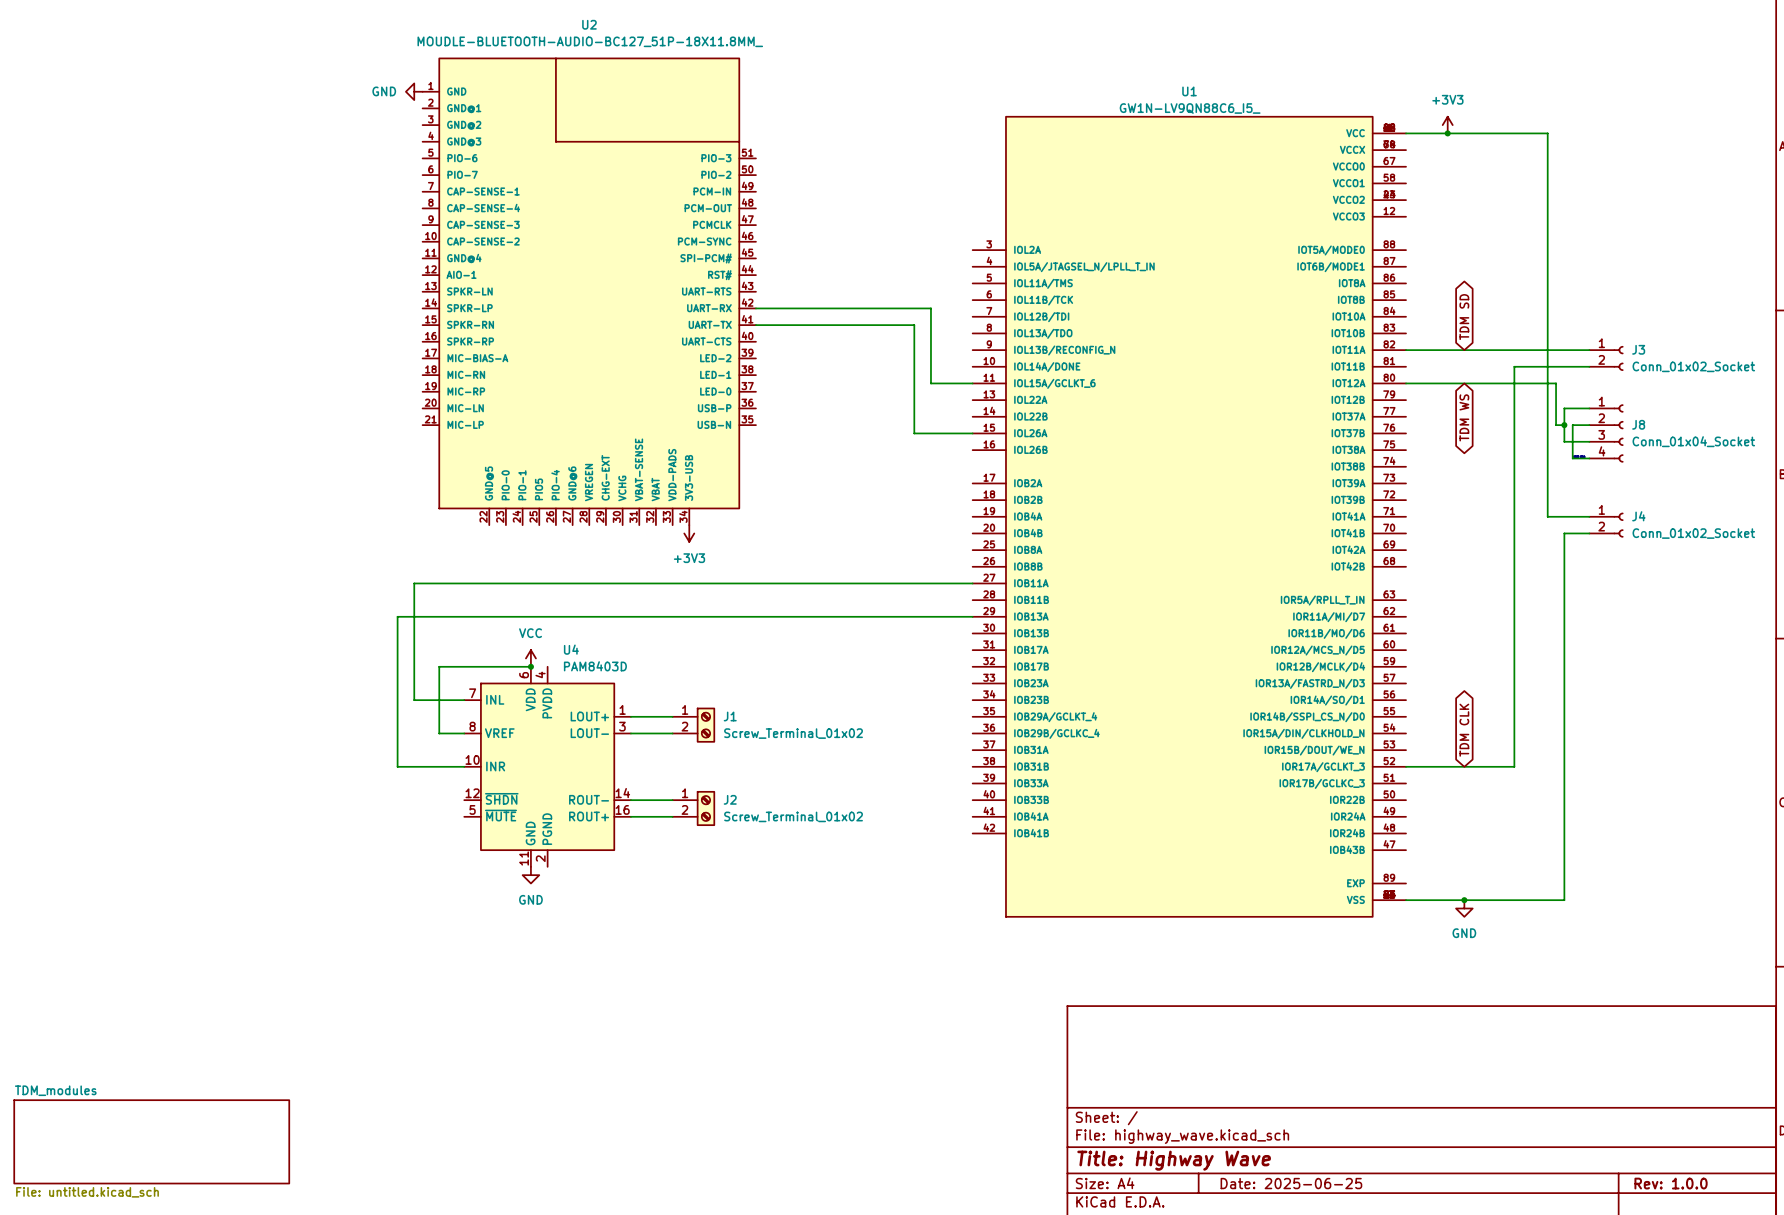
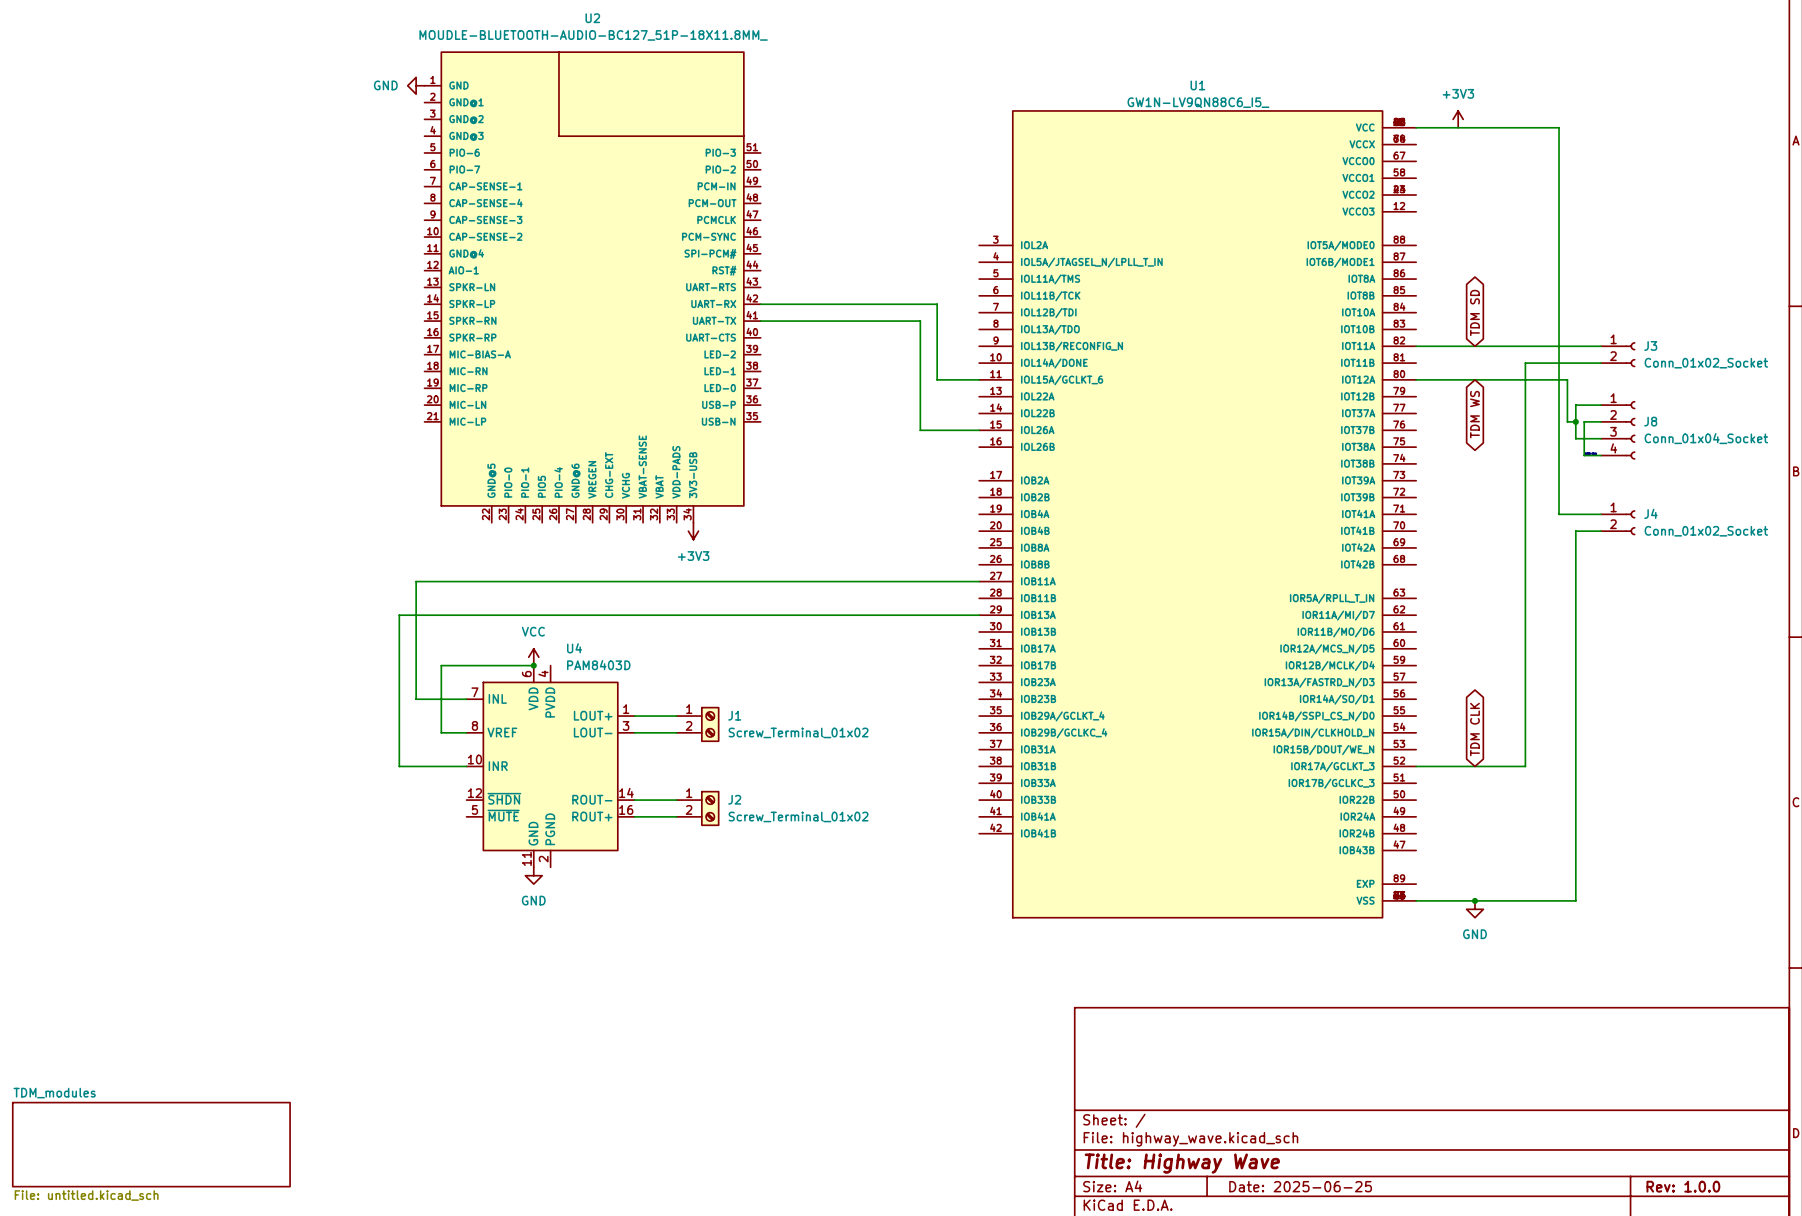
junction: (1447, 133) -> none

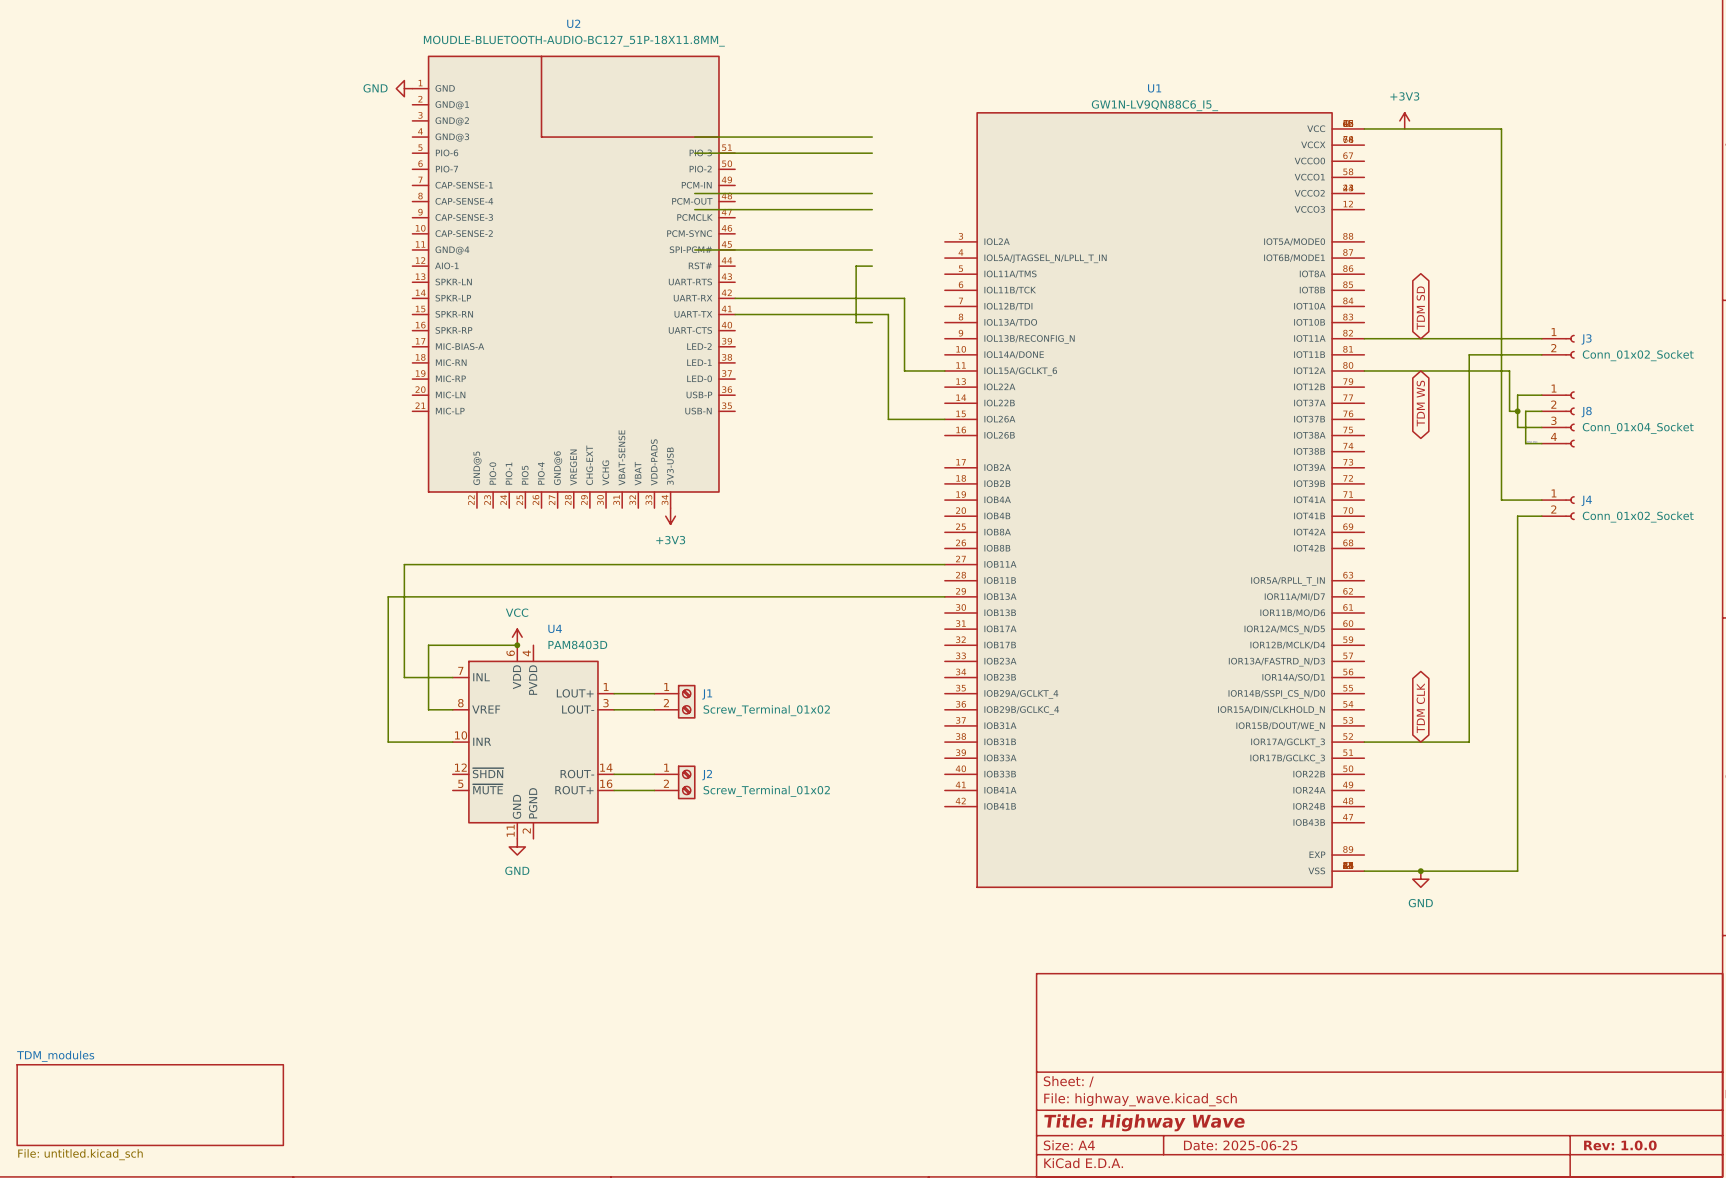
wire: none -> (694, 137) (872, 137)
wire: none -> (694, 153) (872, 153)
wire: none -> (694, 193) (872, 193)
wire: none -> (694, 209) (872, 209)
wire: none -> (694, 249) (872, 249)
wire: none -> (872, 266) (856, 266) (856, 322) (872, 322)

